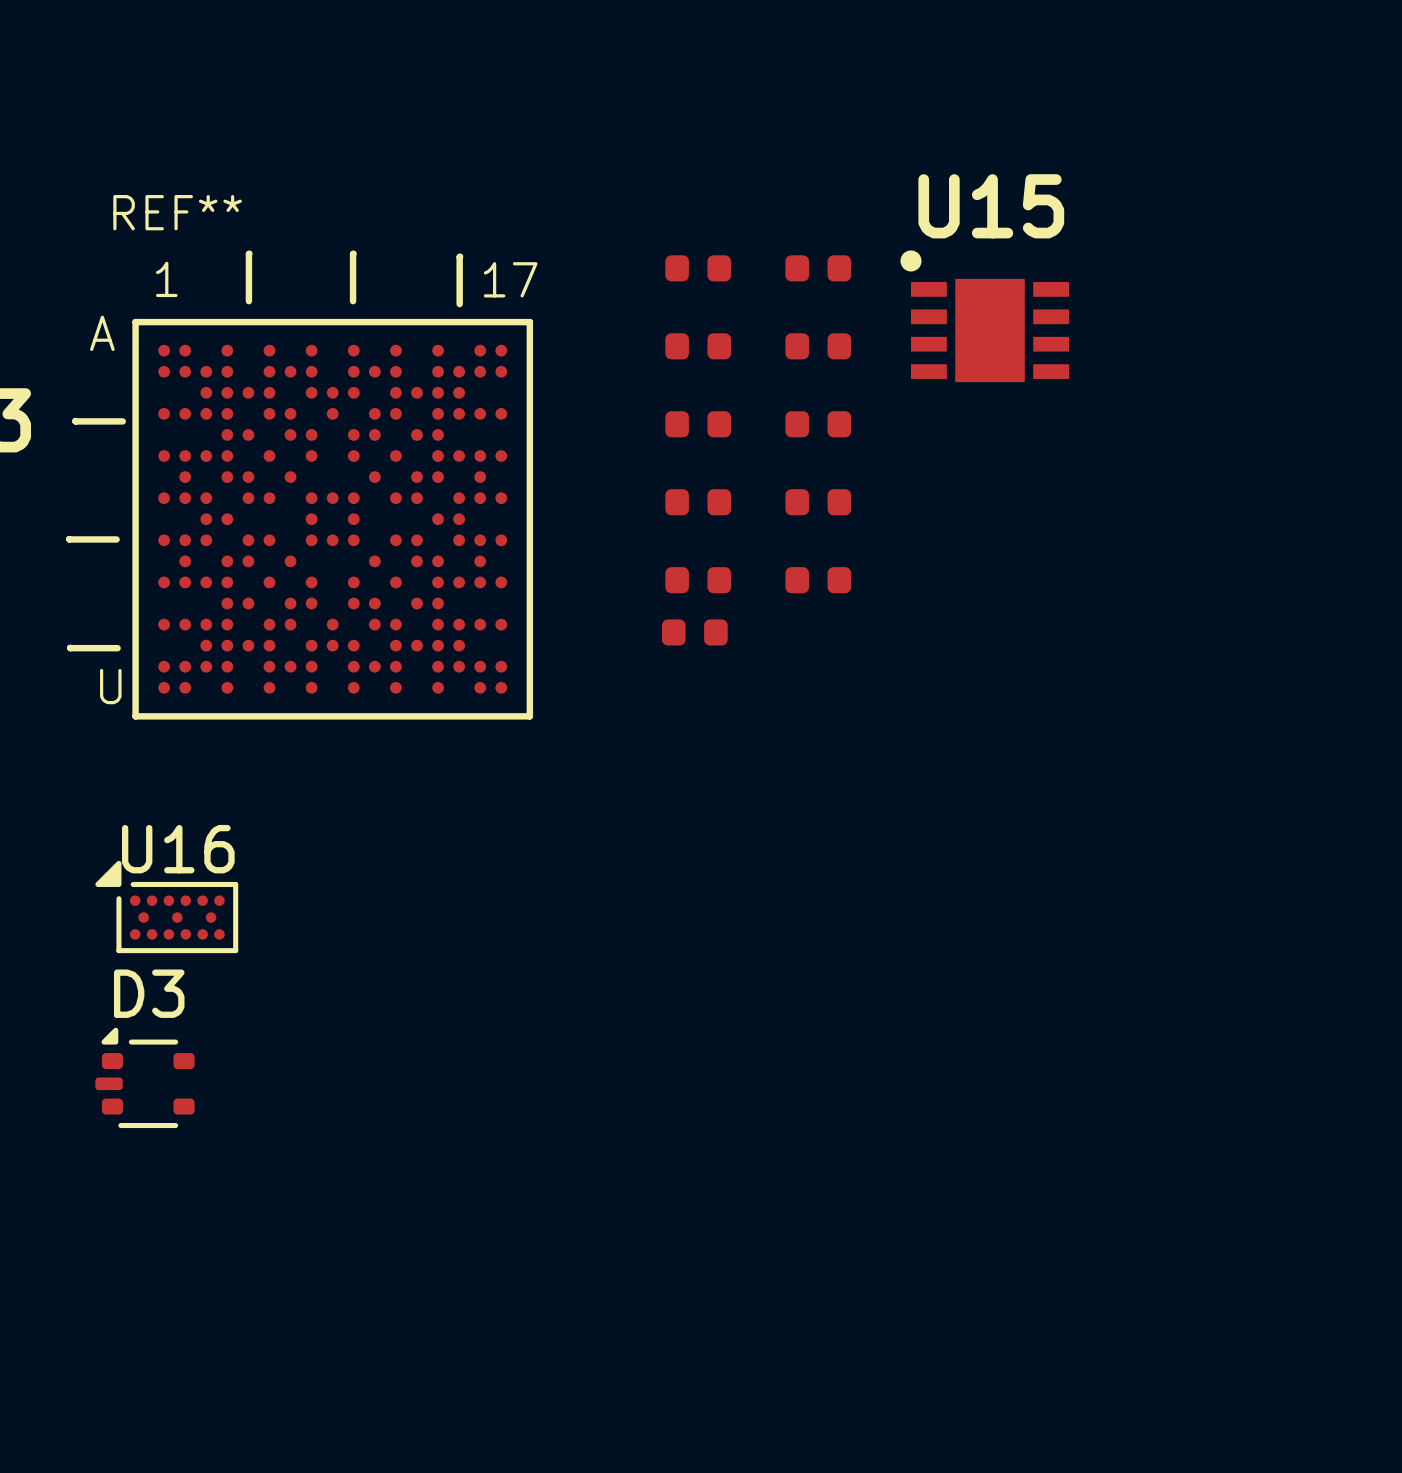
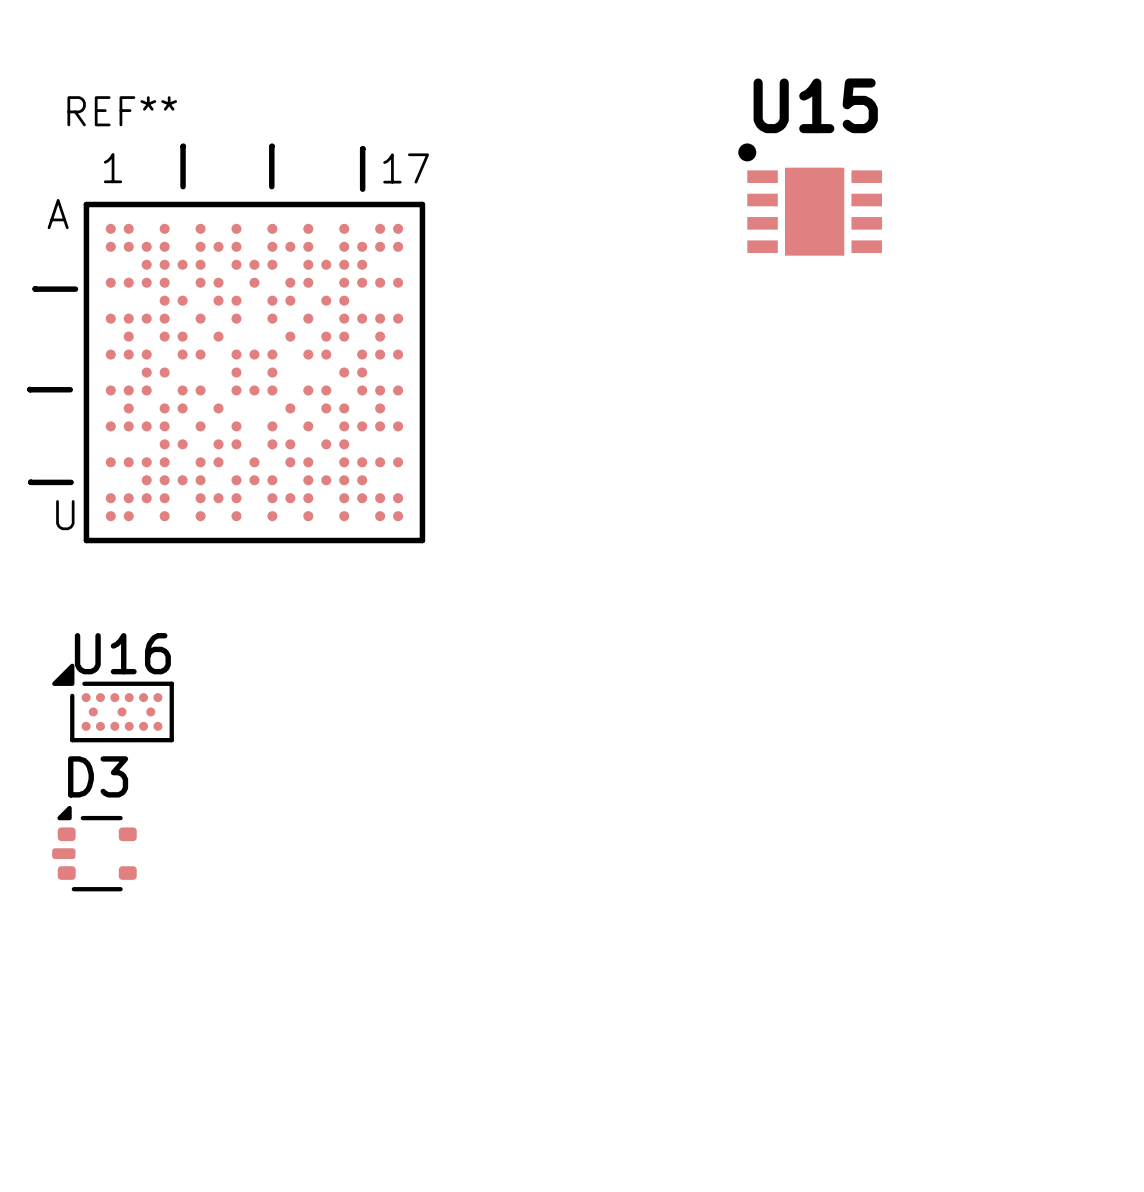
part: (698, 268) -> none
part: (818, 268) -> none
part: (698, 346) -> none
part: (818, 346) -> none
part: (698, 424) -> none
part: (818, 424) -> none
part: (698, 502) -> none
part: (818, 502) -> none
part: (698, 580) -> none
part: (818, 580) -> none
part: (694, 632) -> none

